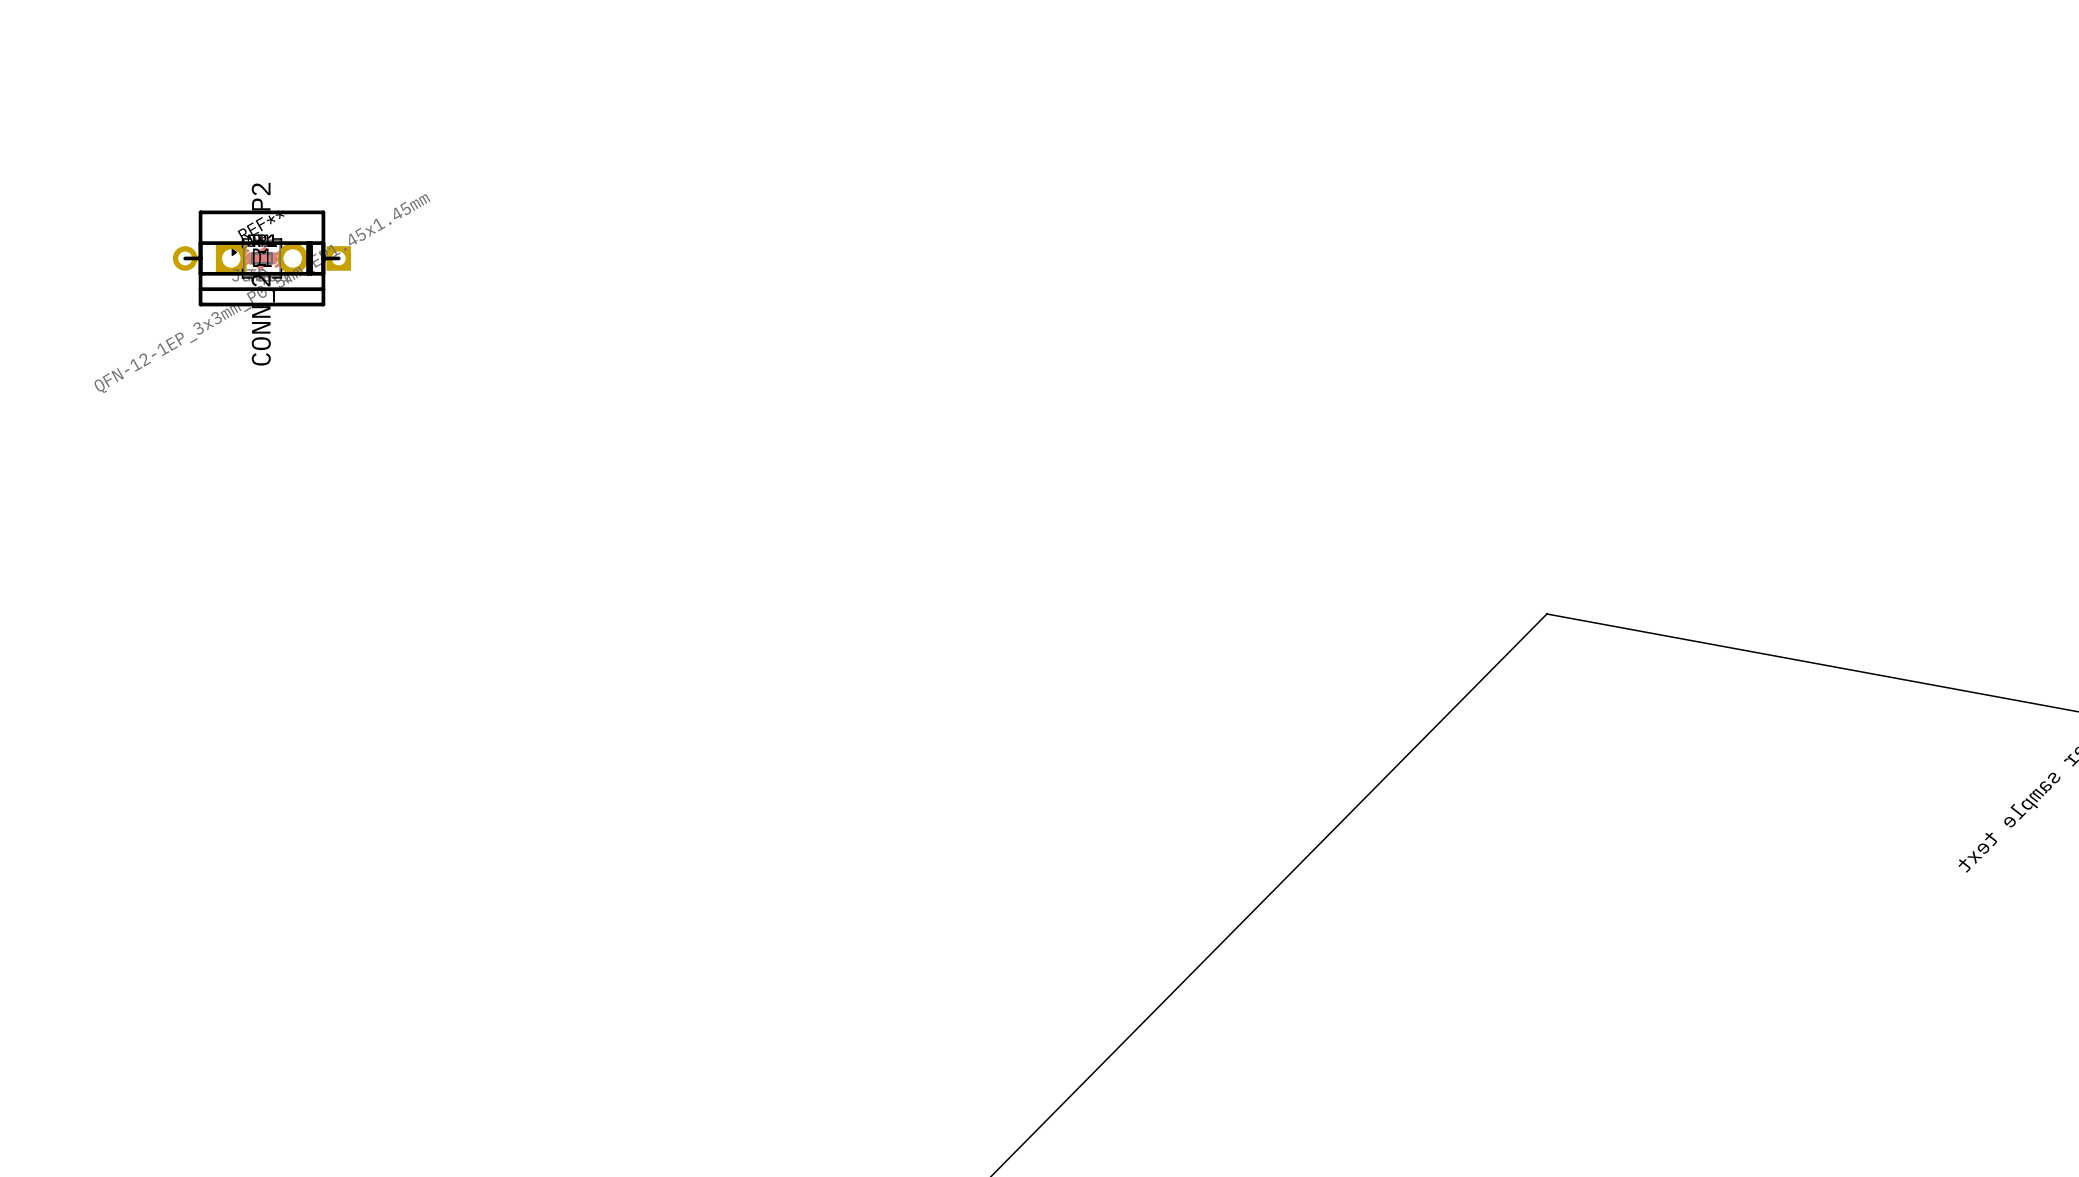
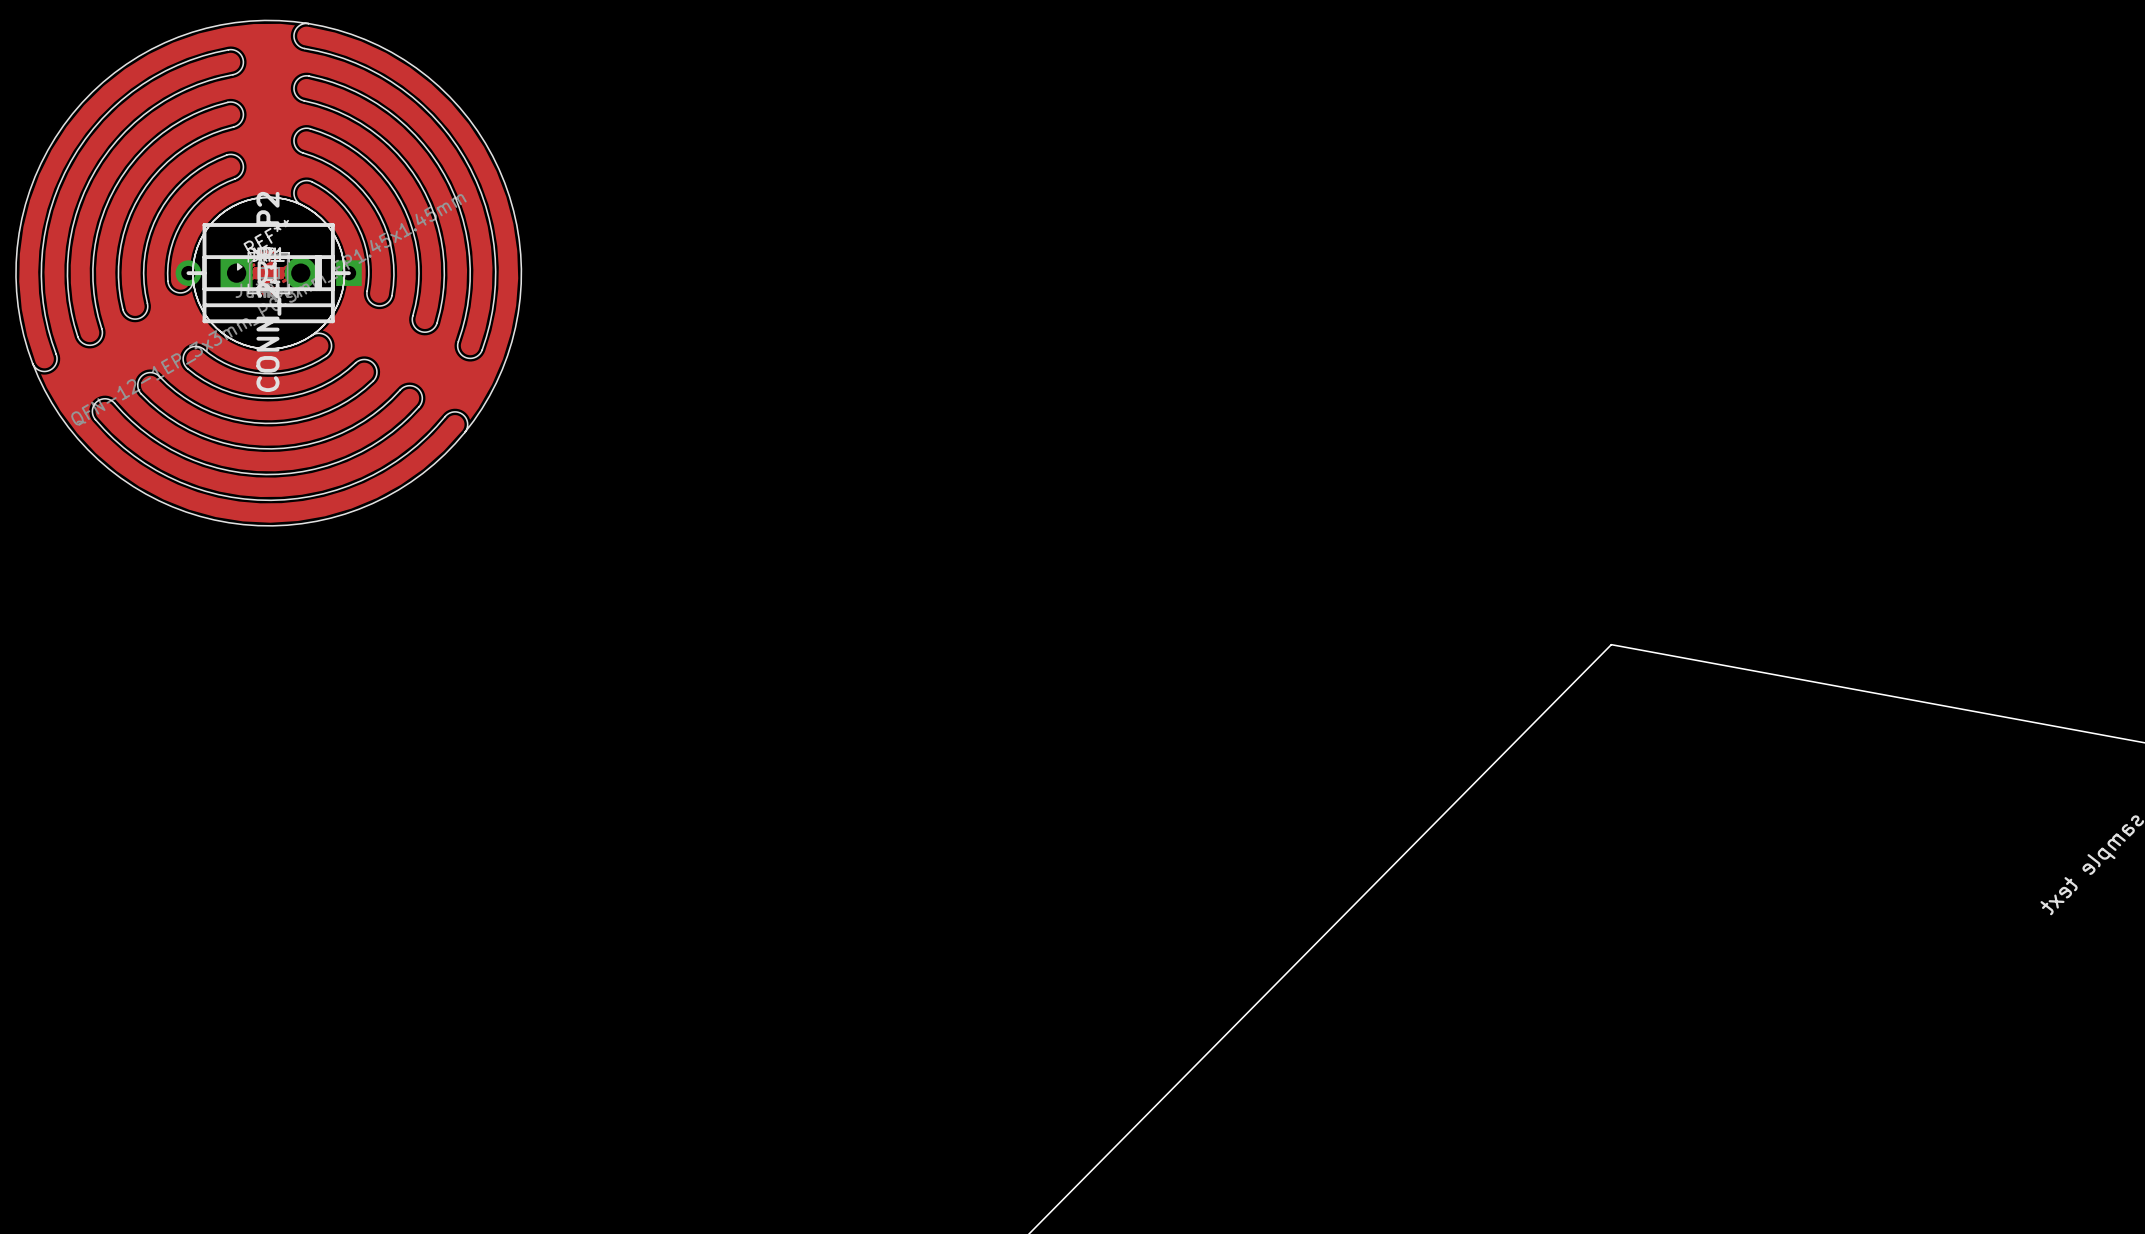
part: none -> (268, 273)

